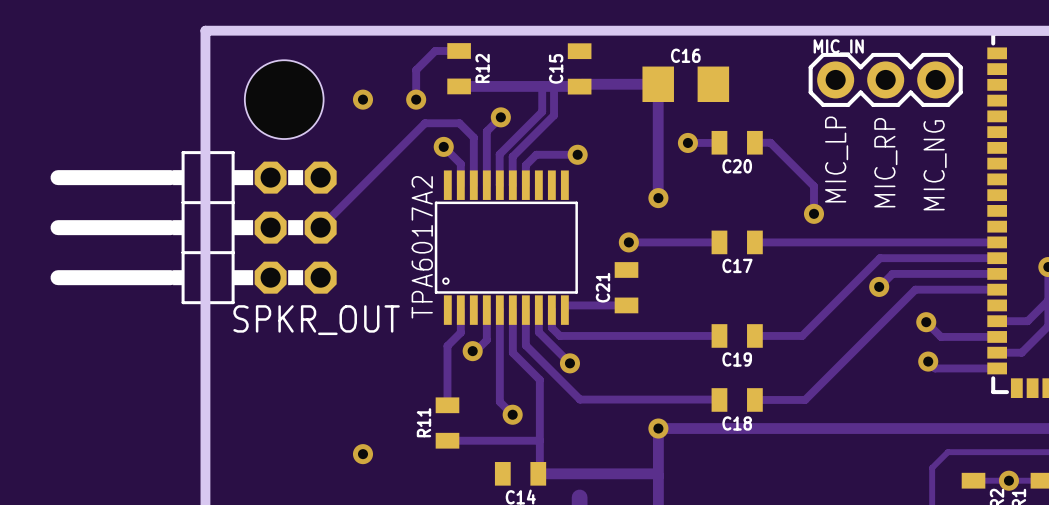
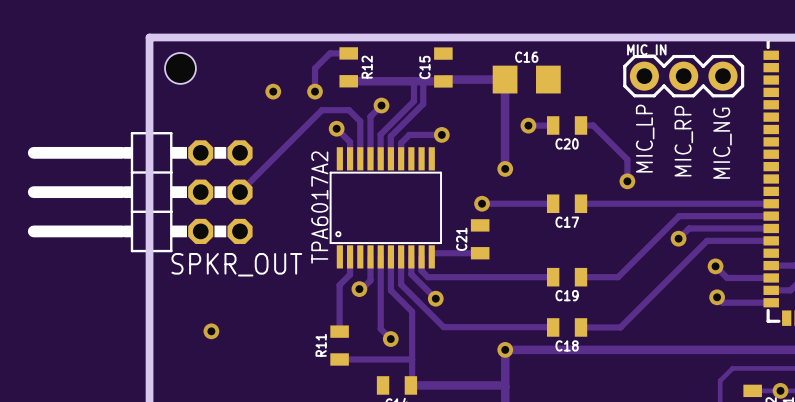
hole: none -> (180, 68)
hole: (284, 99) -> none
via position: (362, 454) -> (211, 331)

